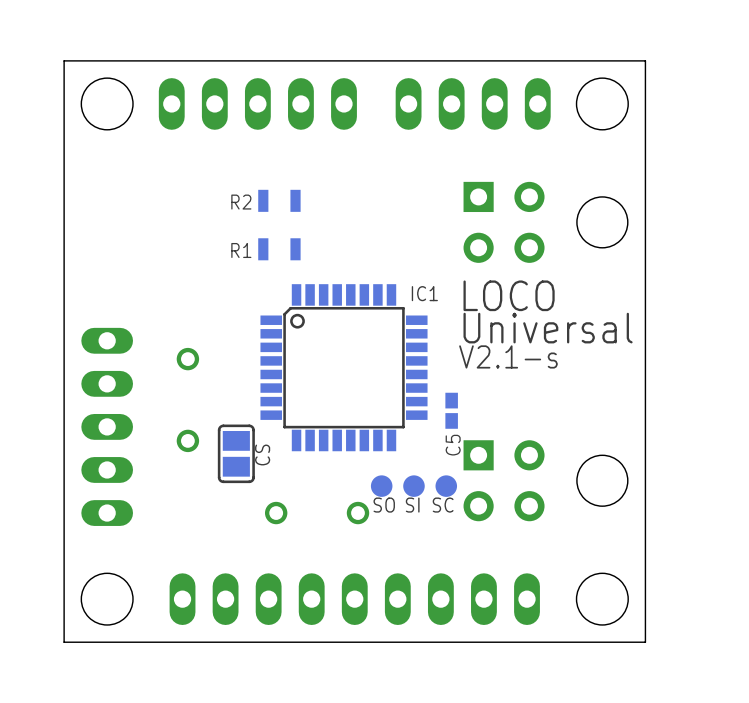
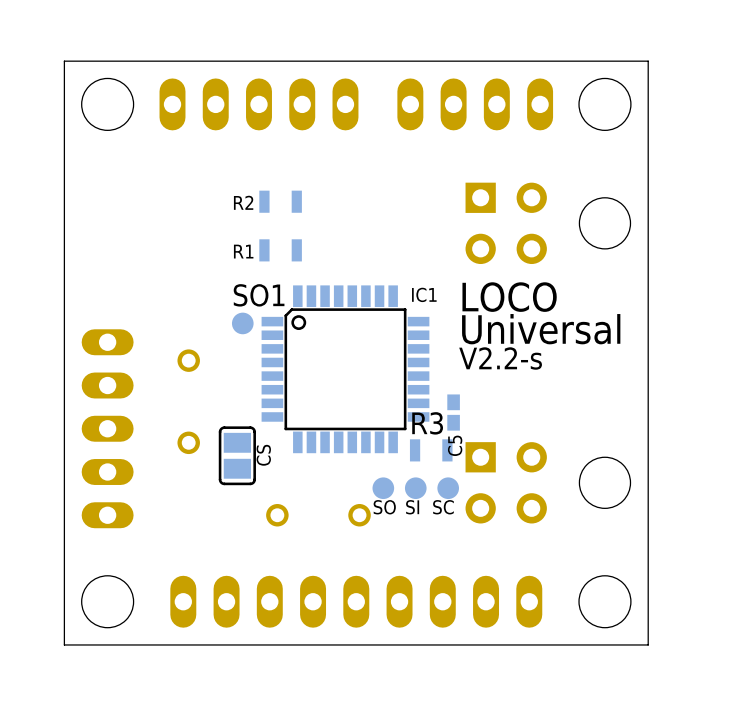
SO1: none -> (242, 323)
text: V2.1-s (508, 356) -> V2.2-s (500, 358)
R3: none -> (431, 450)

